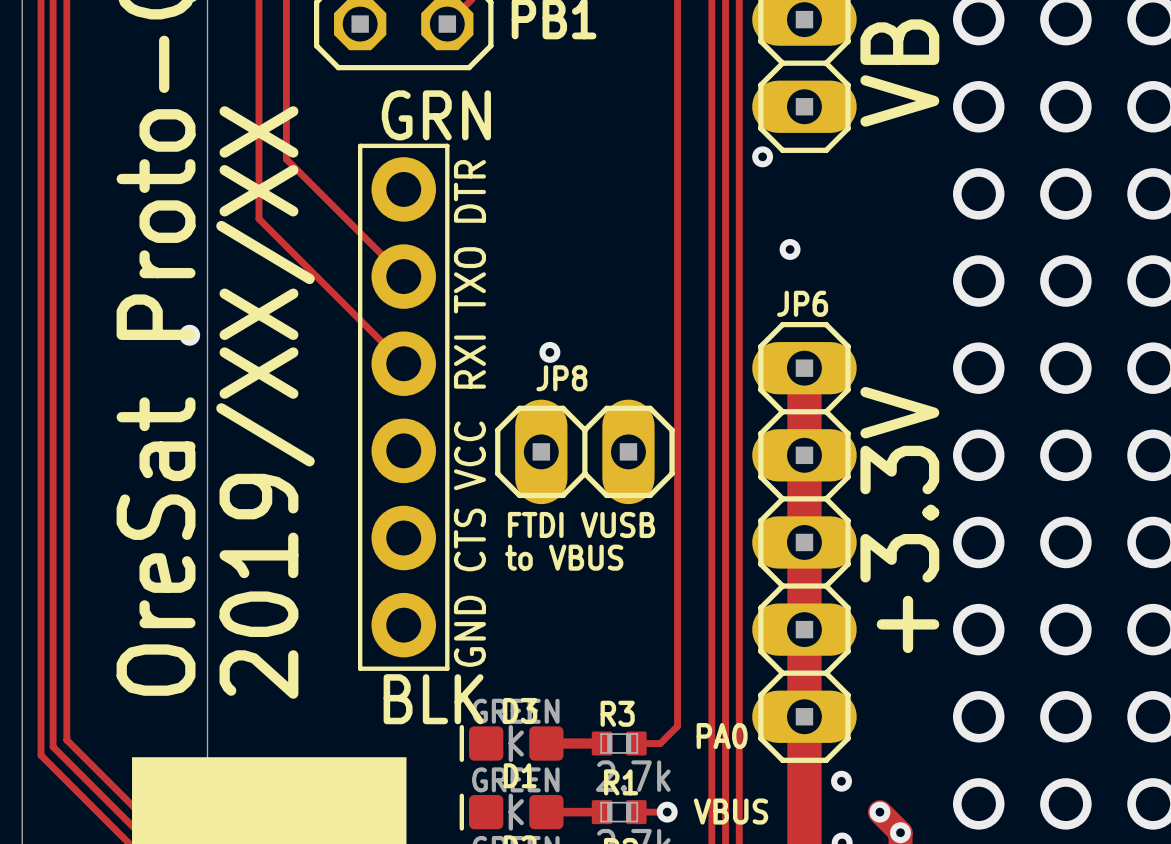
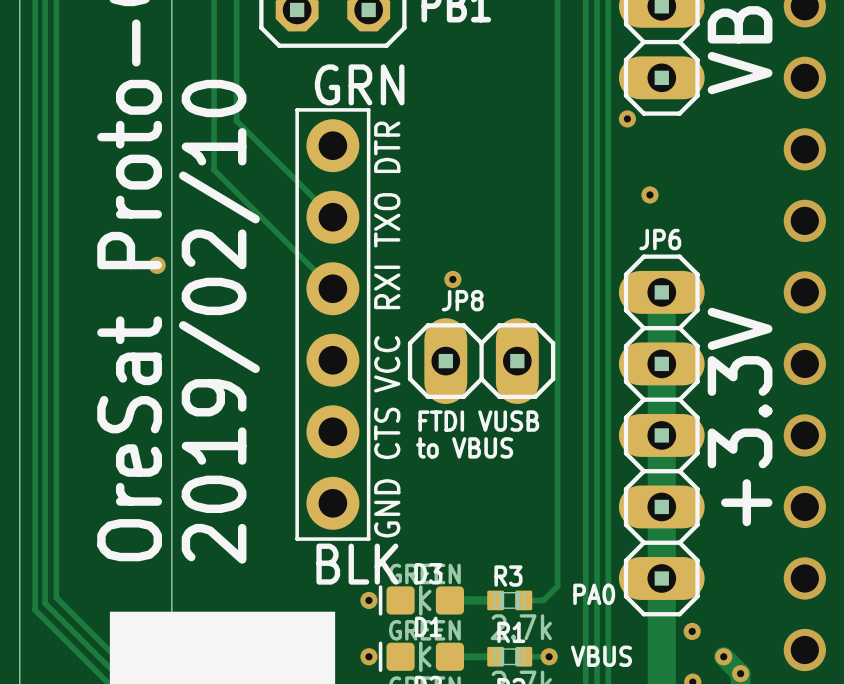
text: 2019/XX/XX (265, 402) -> 2019/02/10 (219, 321)
via: none -> (368, 600)
via: none -> (368, 656)

